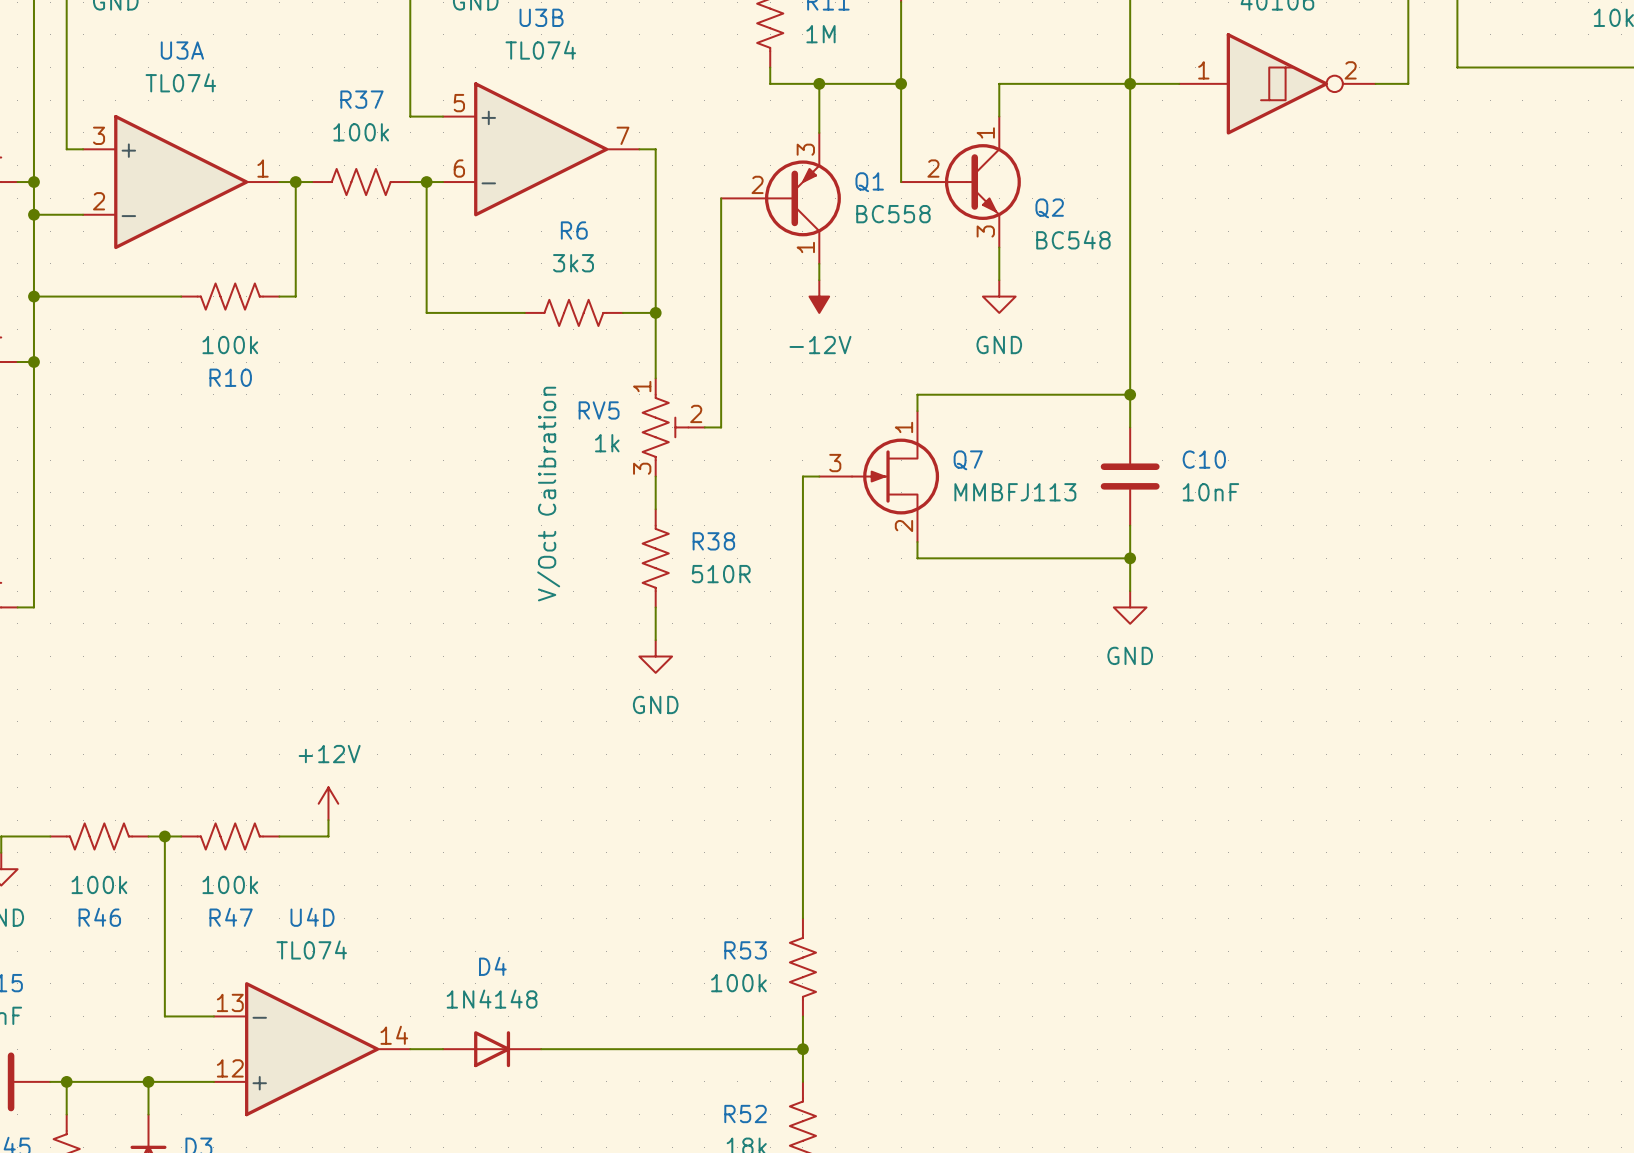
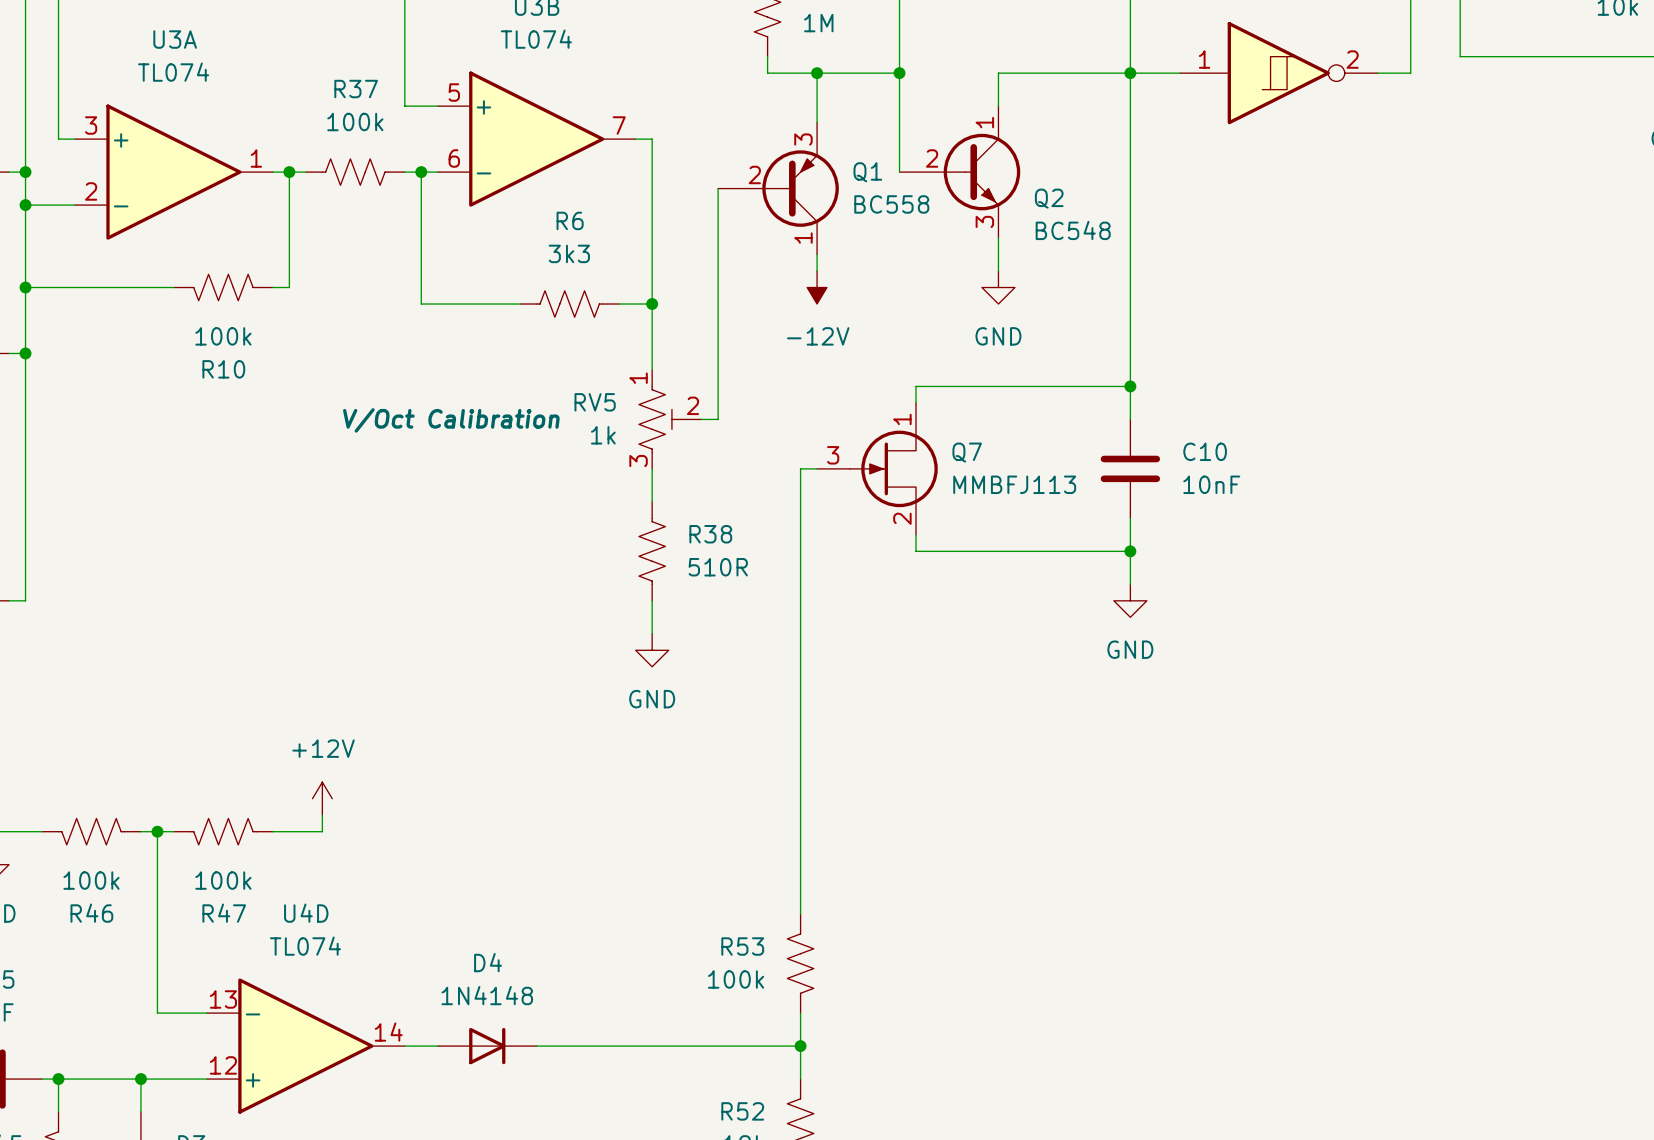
RV5 text: none -> V/Oct Calibration (451, 420)
RV5 text: V/Oct Calibration (548, 494) -> none

